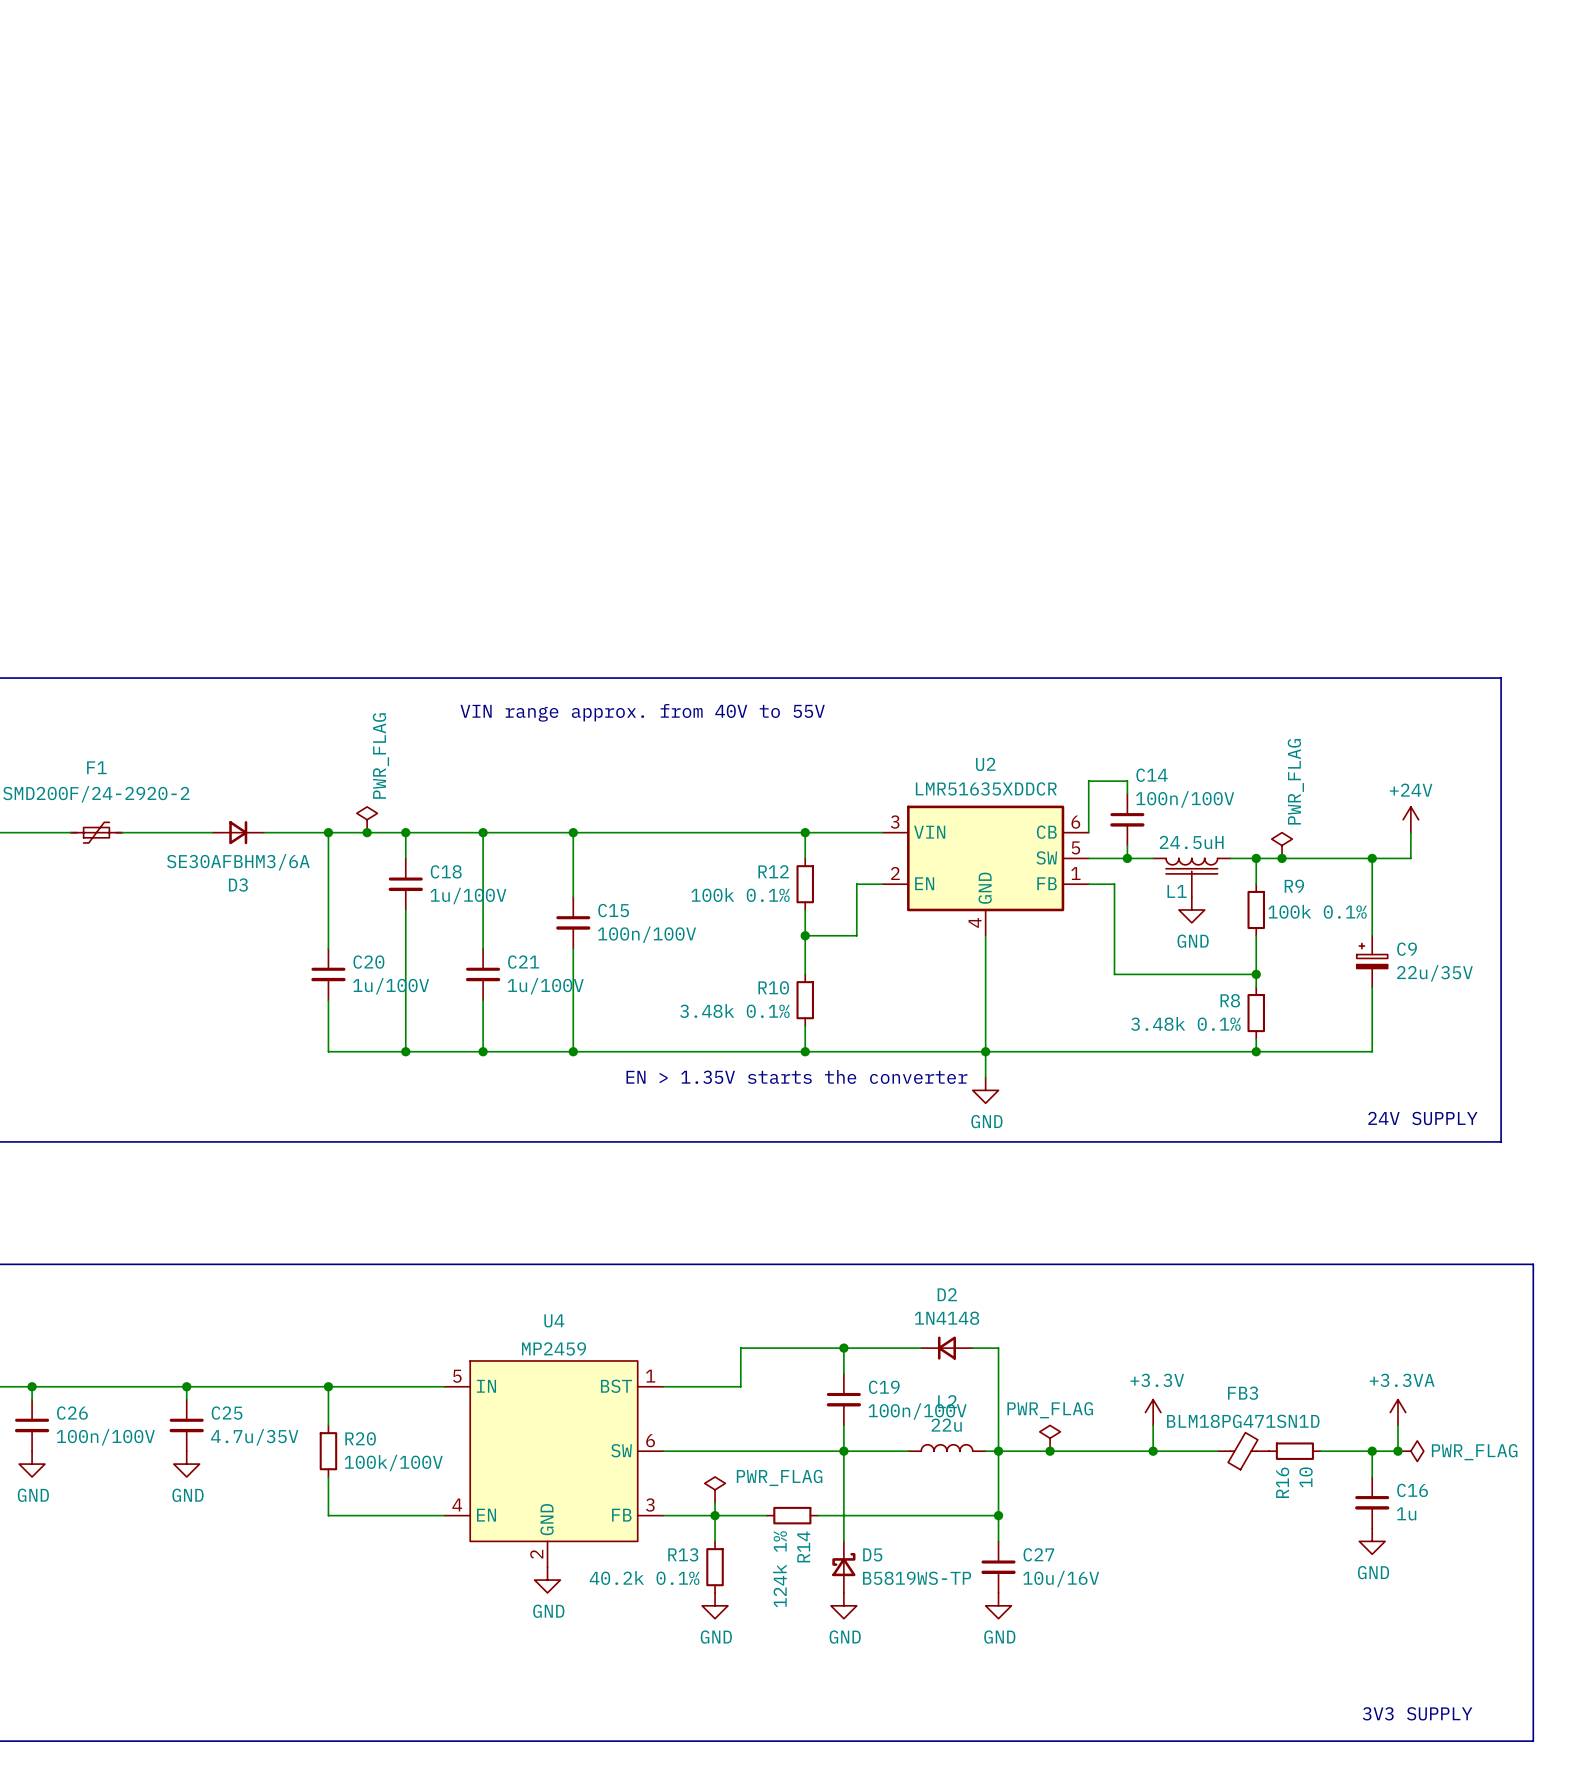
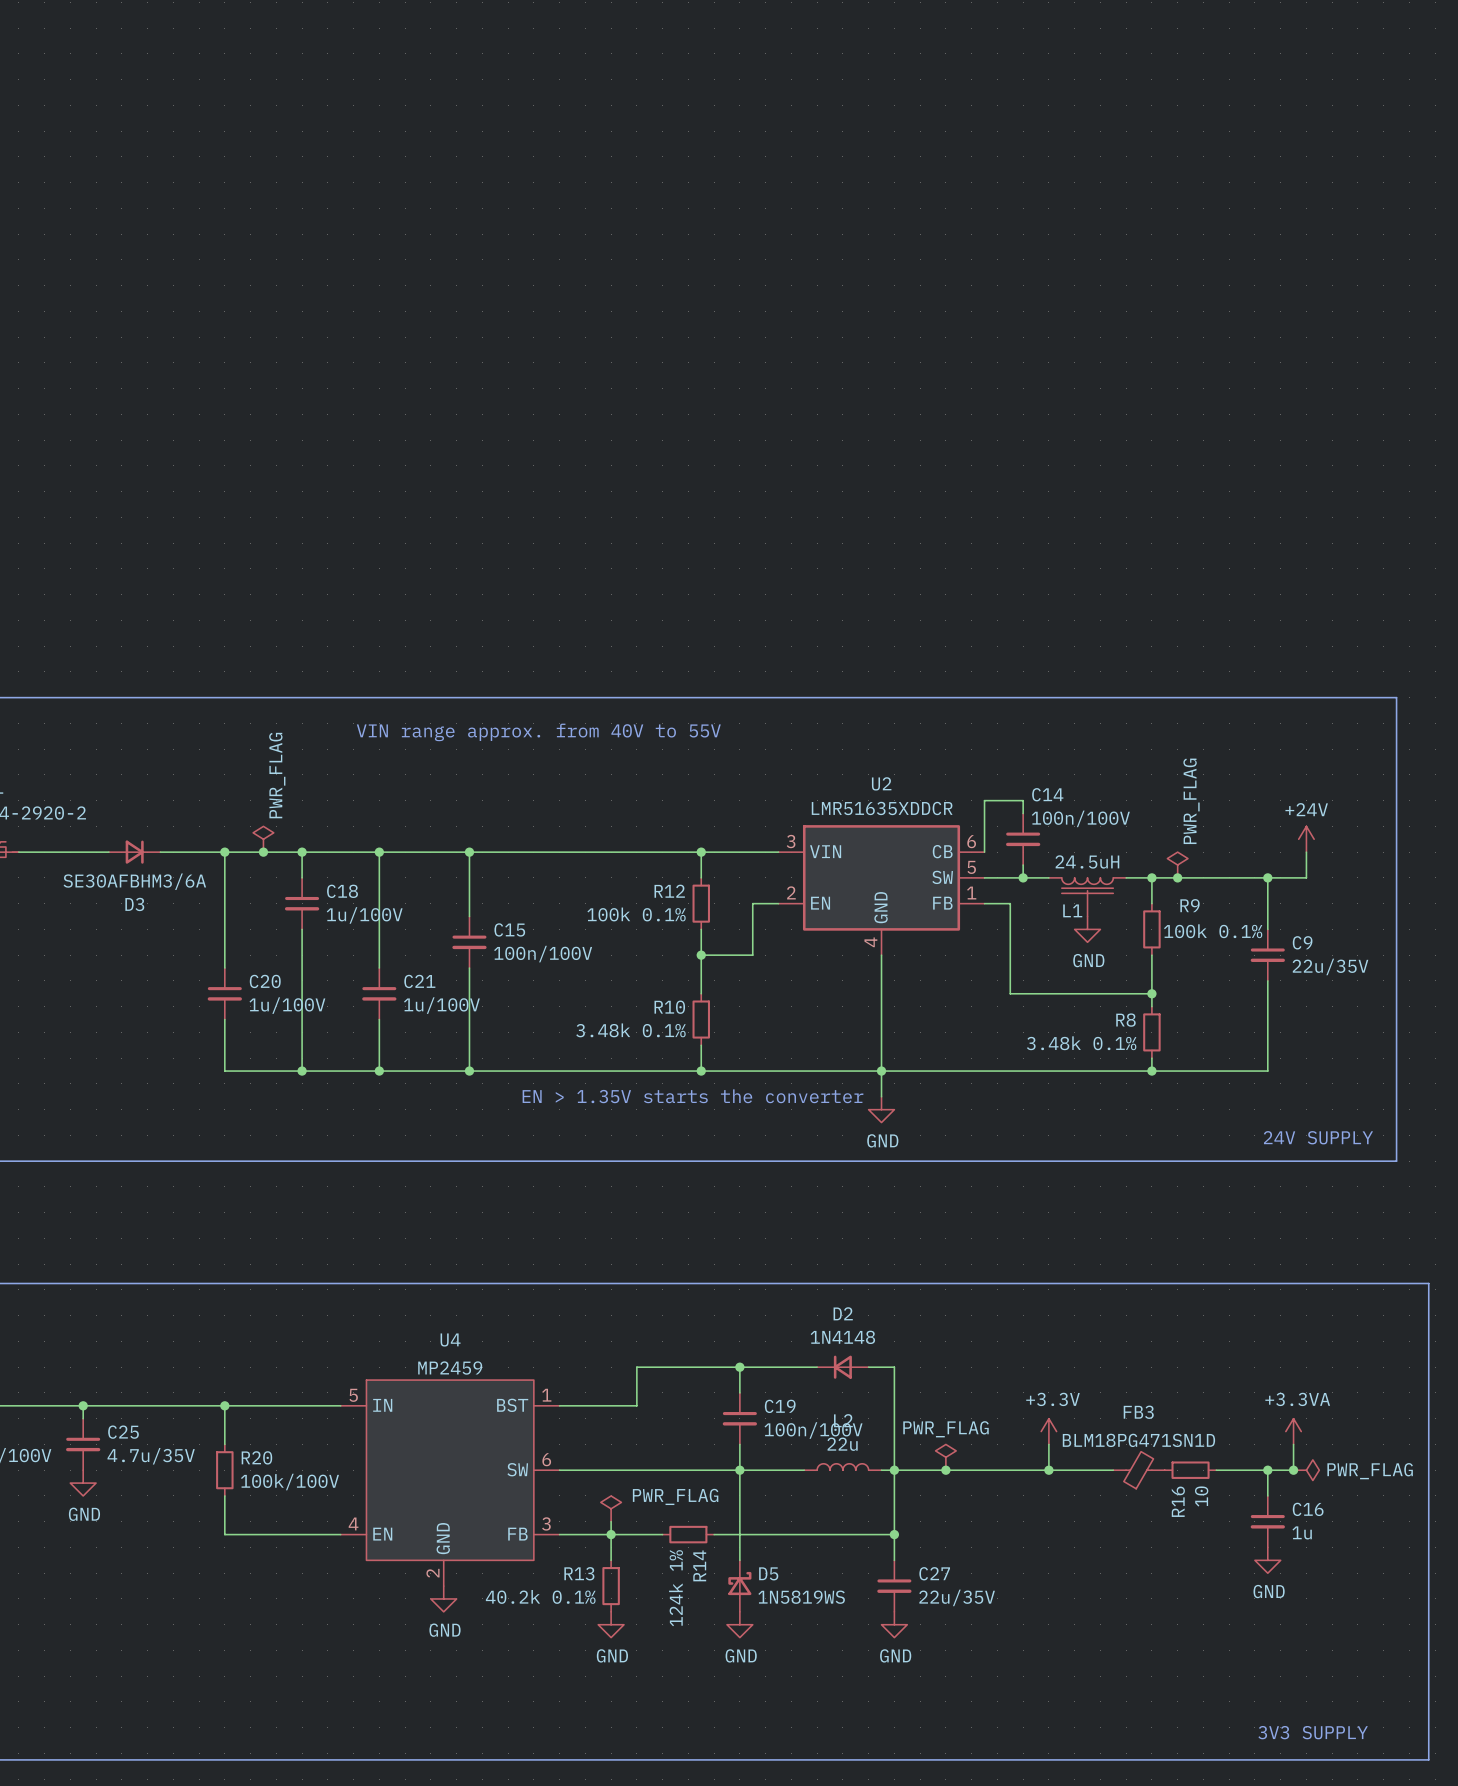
C9 symbol: [1356, 935, 1388, 988] -> [1250, 929, 1285, 981]
D5 value: B5819WS-TP (917, 1578) -> 1N5819WS (801, 1597)
C27 value: 10u/16V (1061, 1578) -> 22u/35V (957, 1597)

